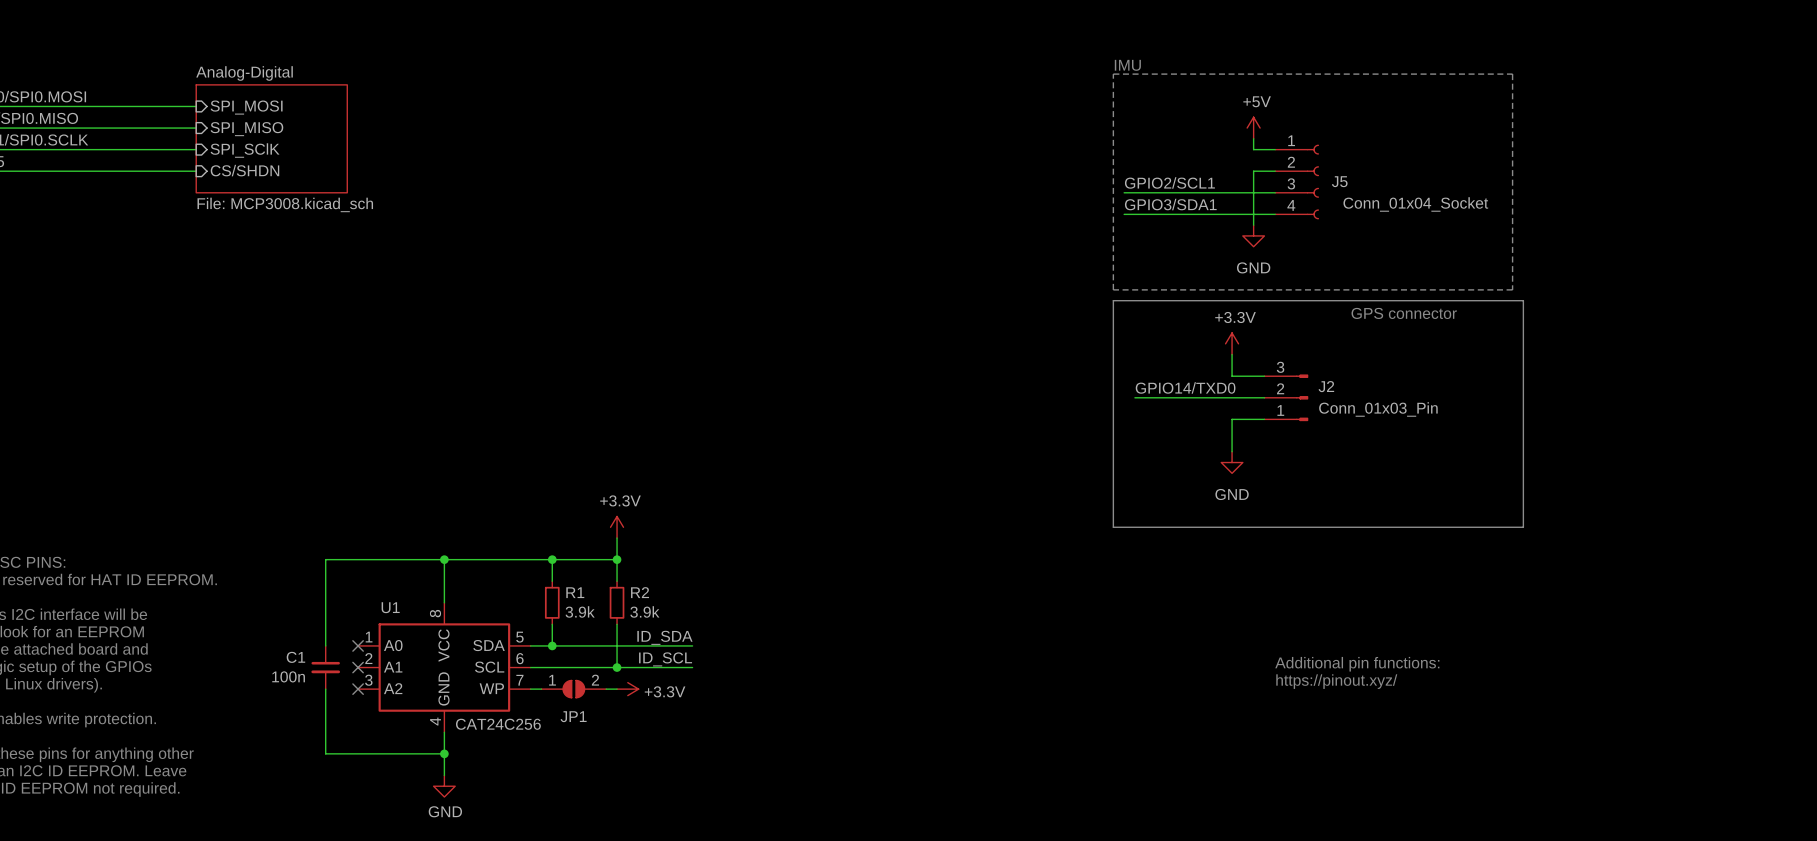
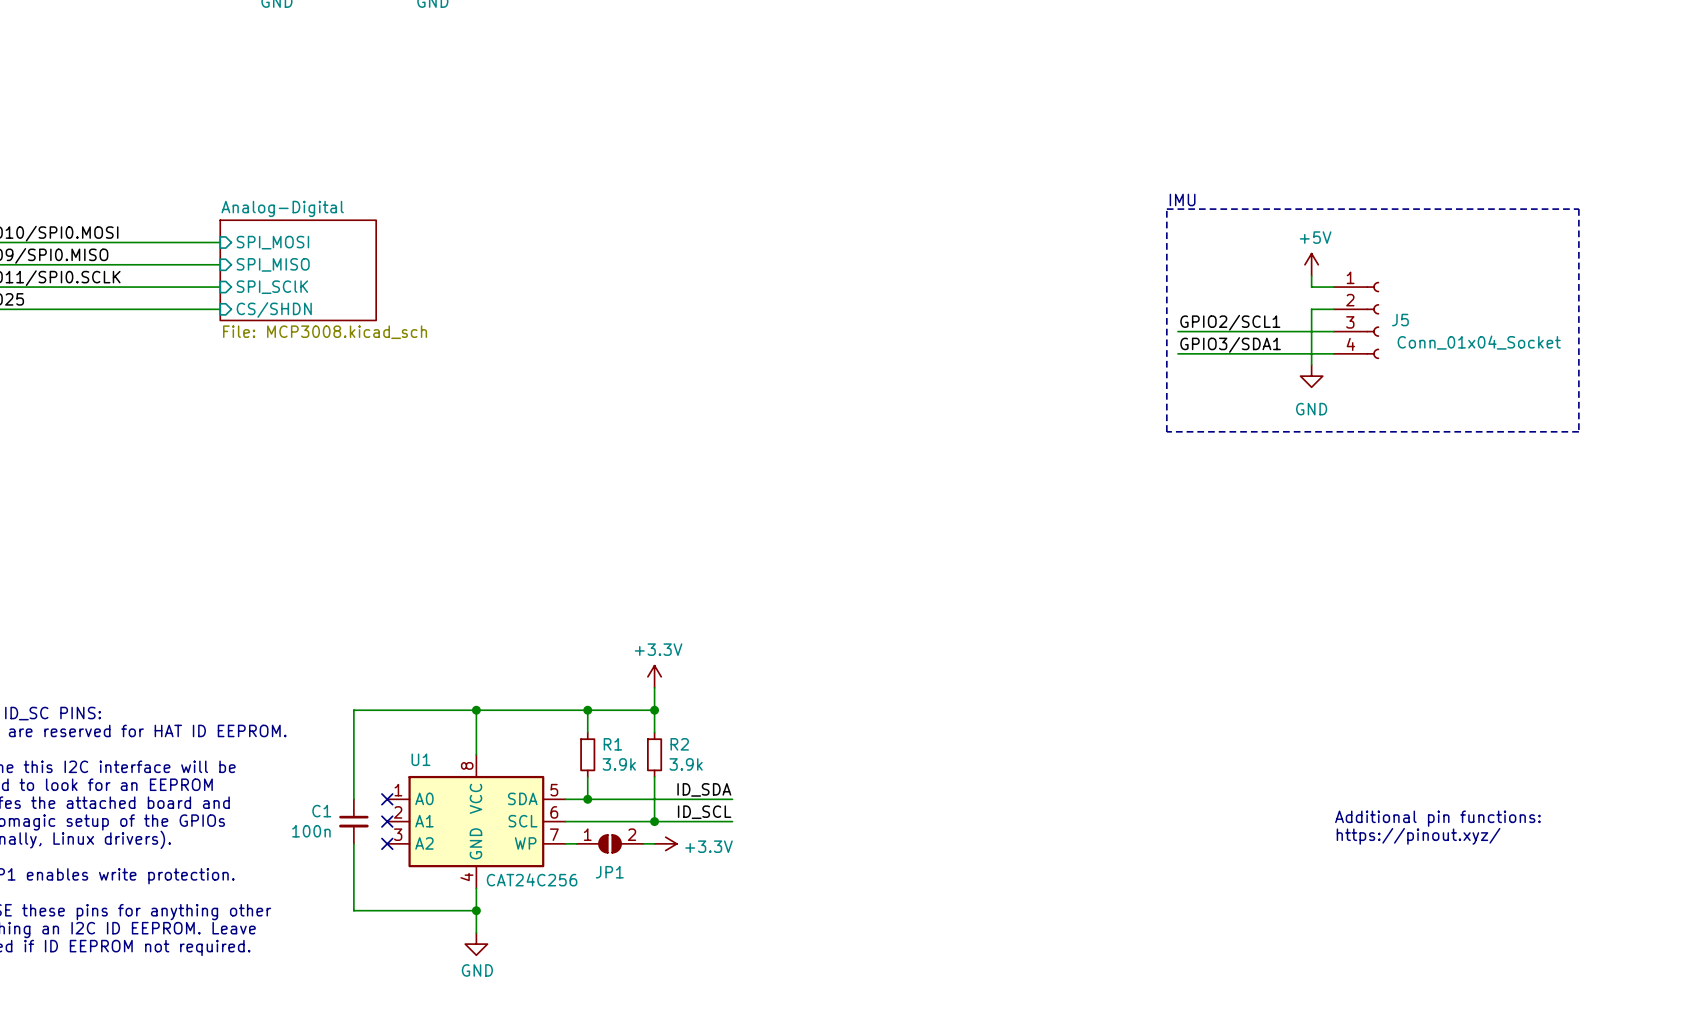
sheet Analog-Digital shape: [195, 84, 348, 194] -> [219, 219, 377, 322]
line: (1113, 300) (1523, 300) (1523, 527) (1113, 527) (1113, 300) -> none
text: GPS connector (1404, 313) -> none
power symbol: +3.3V (1232, 343) -> none
wire: (1232, 354) (1232, 376) (1264, 376) -> none
label: GPIO14/TXD0 (1185, 387) -> none
wire: (1134, 397) (1264, 397) -> none
J2: Conn_01x03_Pin (1286, 397) -> none
wire: (1264, 419) (1232, 419) (1232, 451) -> none
power symbol: GND (1232, 462) -> none

